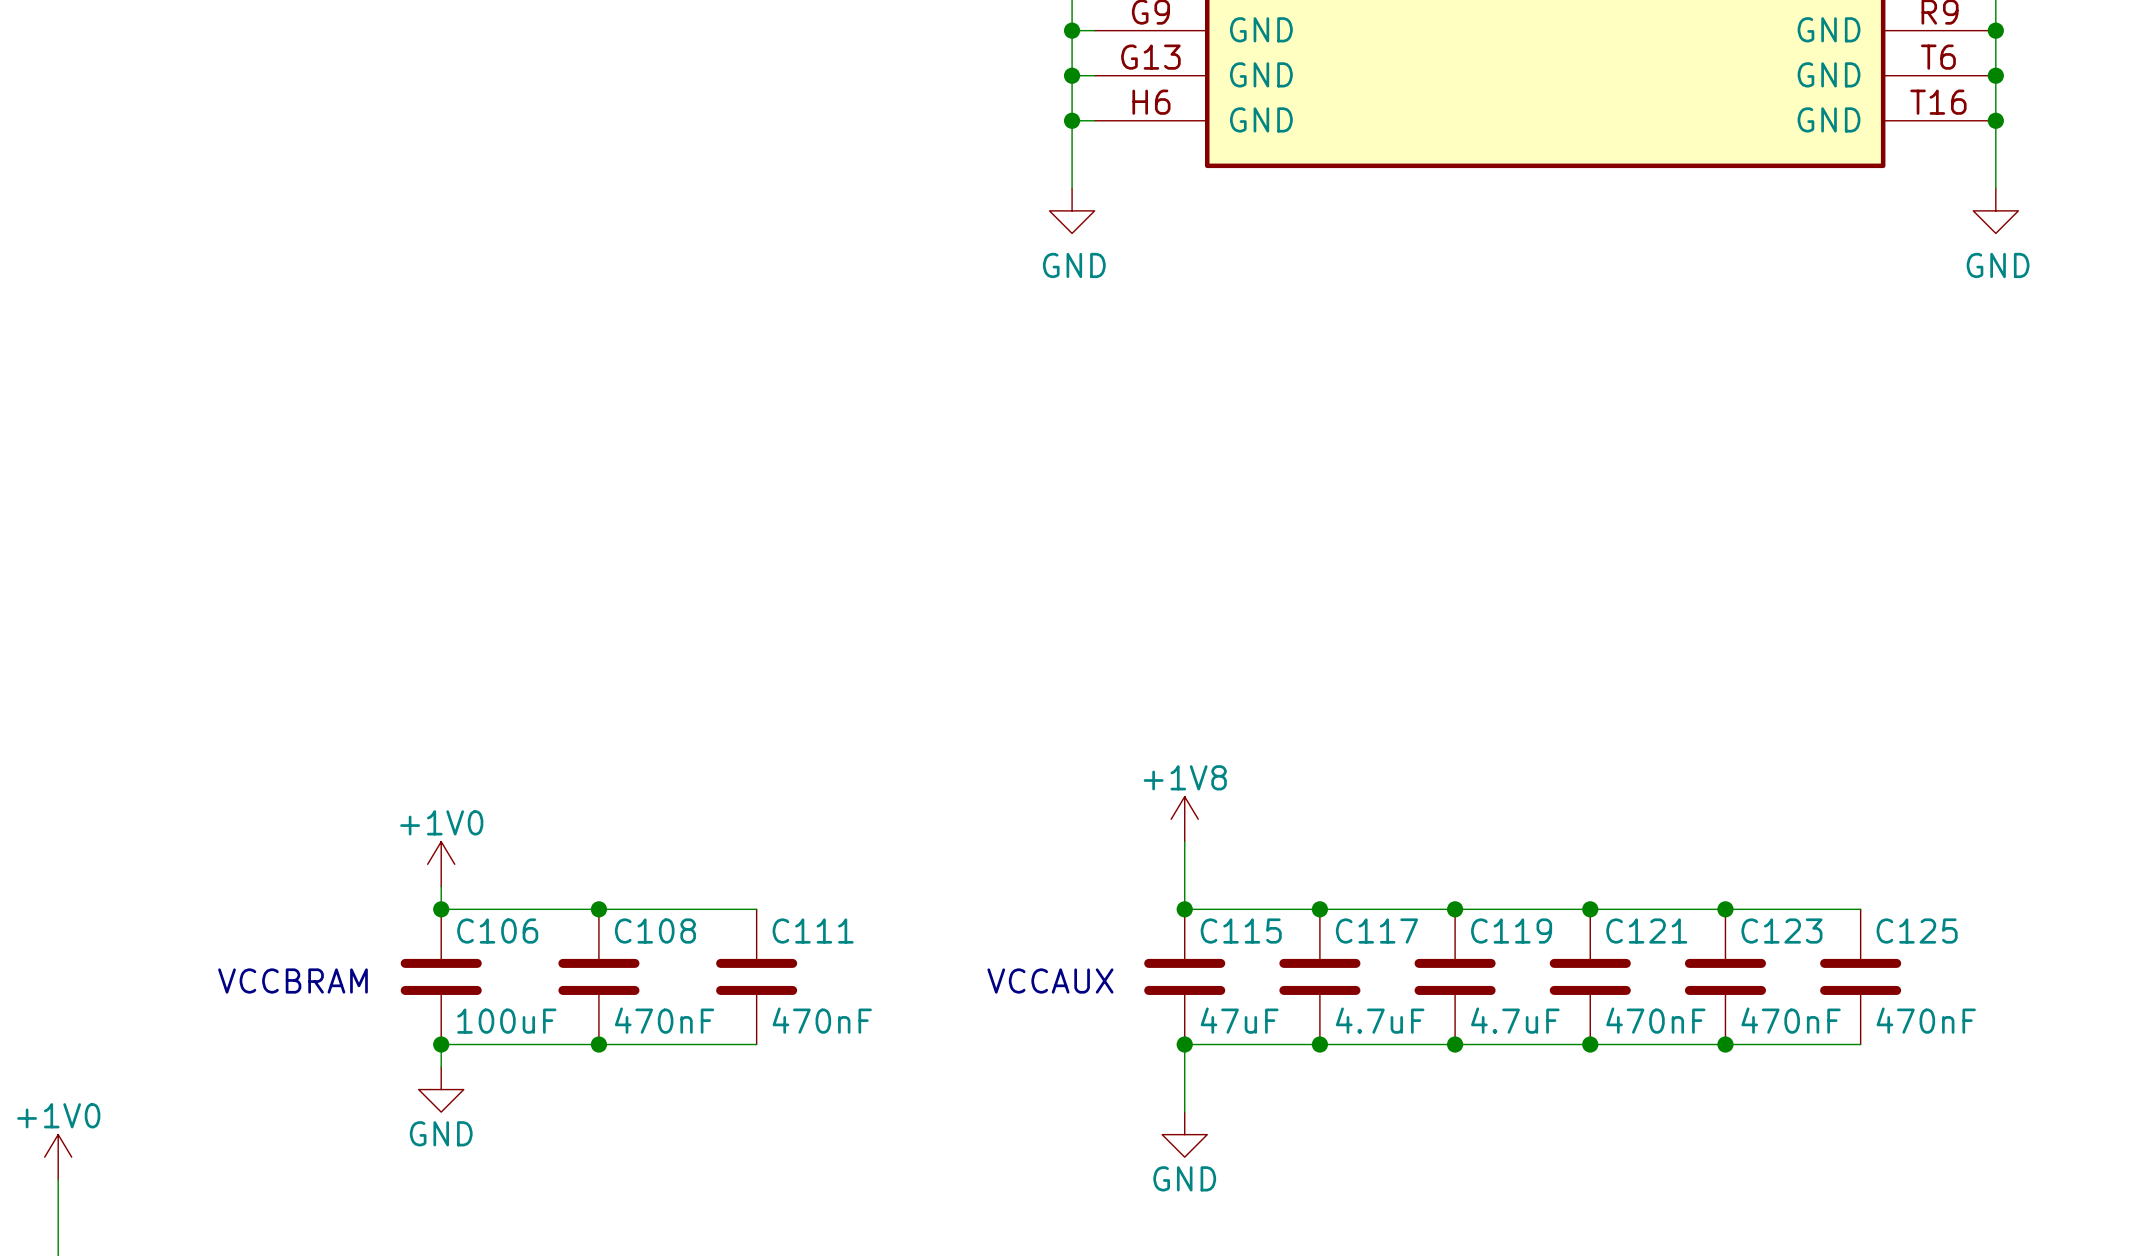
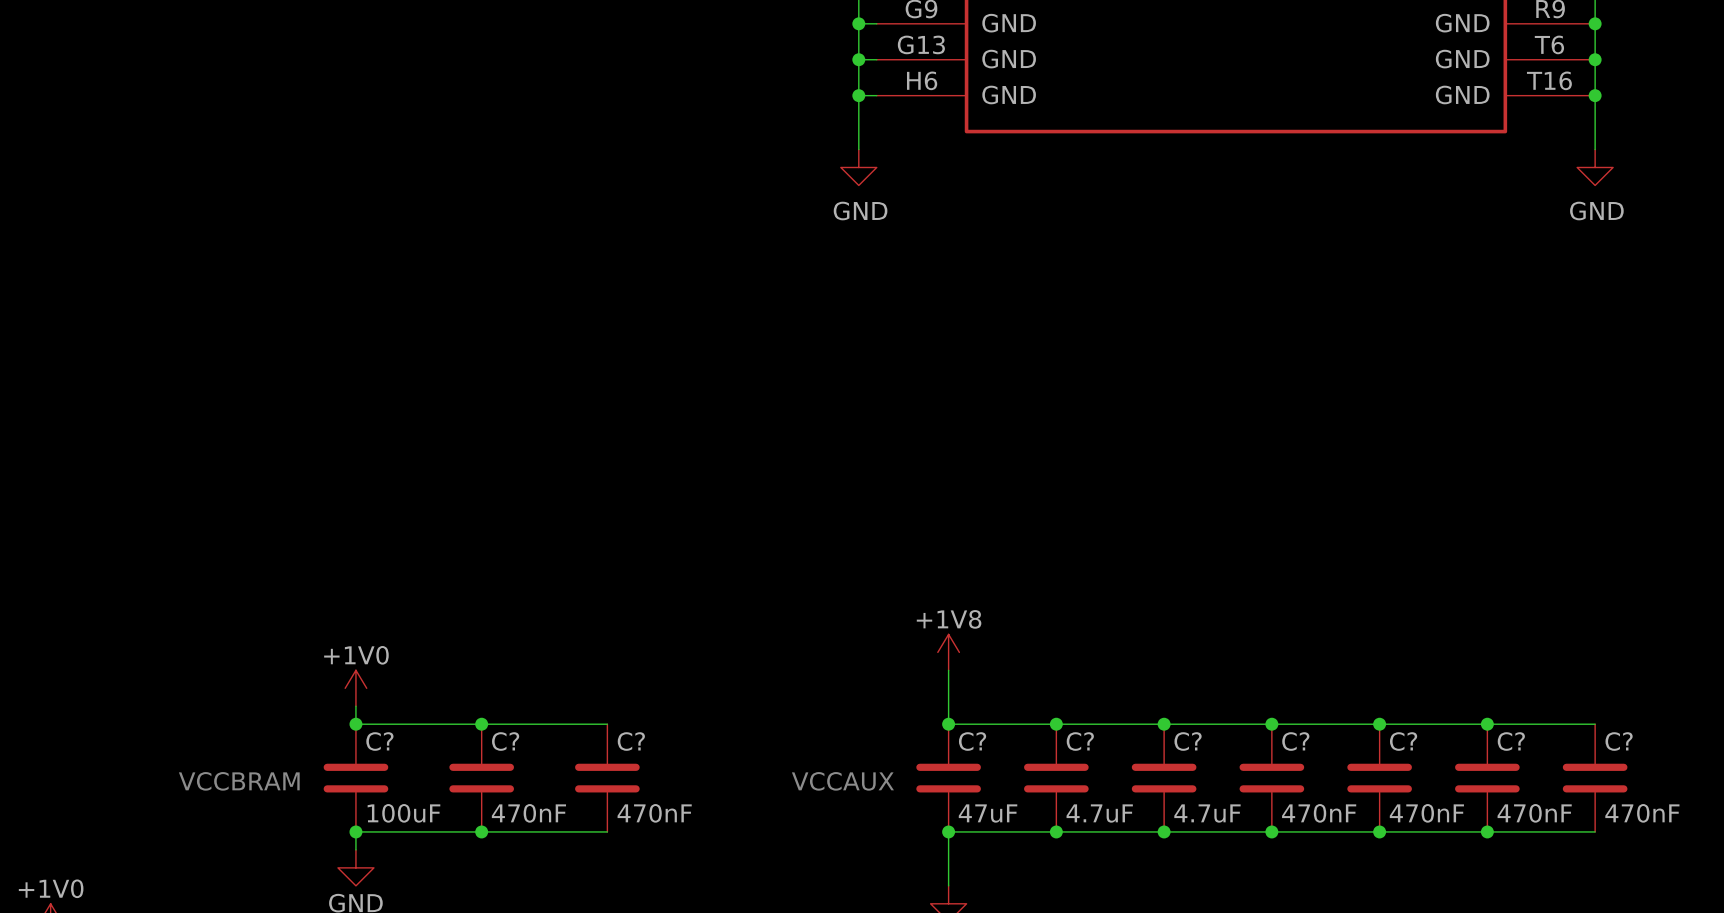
wire: none -> (1487, 724) (1595, 724)
junction: none -> (1487, 724)
C106 name: C106 (497, 931) -> C? (379, 741)
C108 name: C108 (655, 931) -> C? (505, 741)
C111 name: C111 (813, 931) -> C? (631, 741)
C115 name: C115 (1241, 931) -> C? (972, 741)
C117 name: C117 (1376, 931) -> C? (1080, 741)
C119 name: C119 (1511, 931) -> C? (1188, 741)
C121 name: C121 (1646, 931) -> C? (1295, 741)
C123 name: C123 (1781, 931) -> C? (1403, 741)
C125 name: C125 (1917, 931) -> C? (1511, 741)
C?: none -> 470nF (1595, 778)
wire: none -> (1487, 831) (1595, 831)
junction: none -> (1487, 831)

